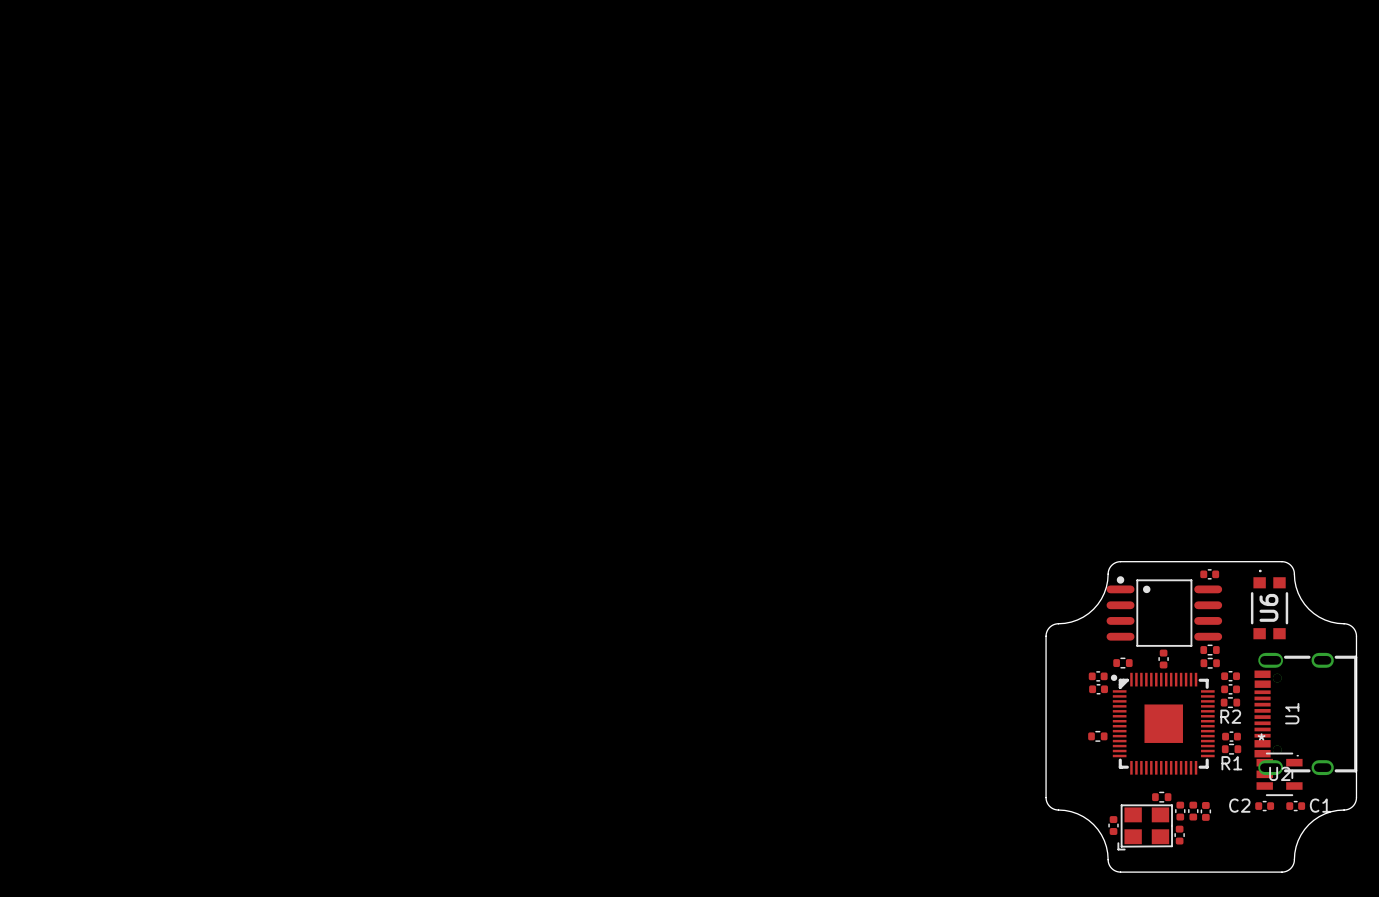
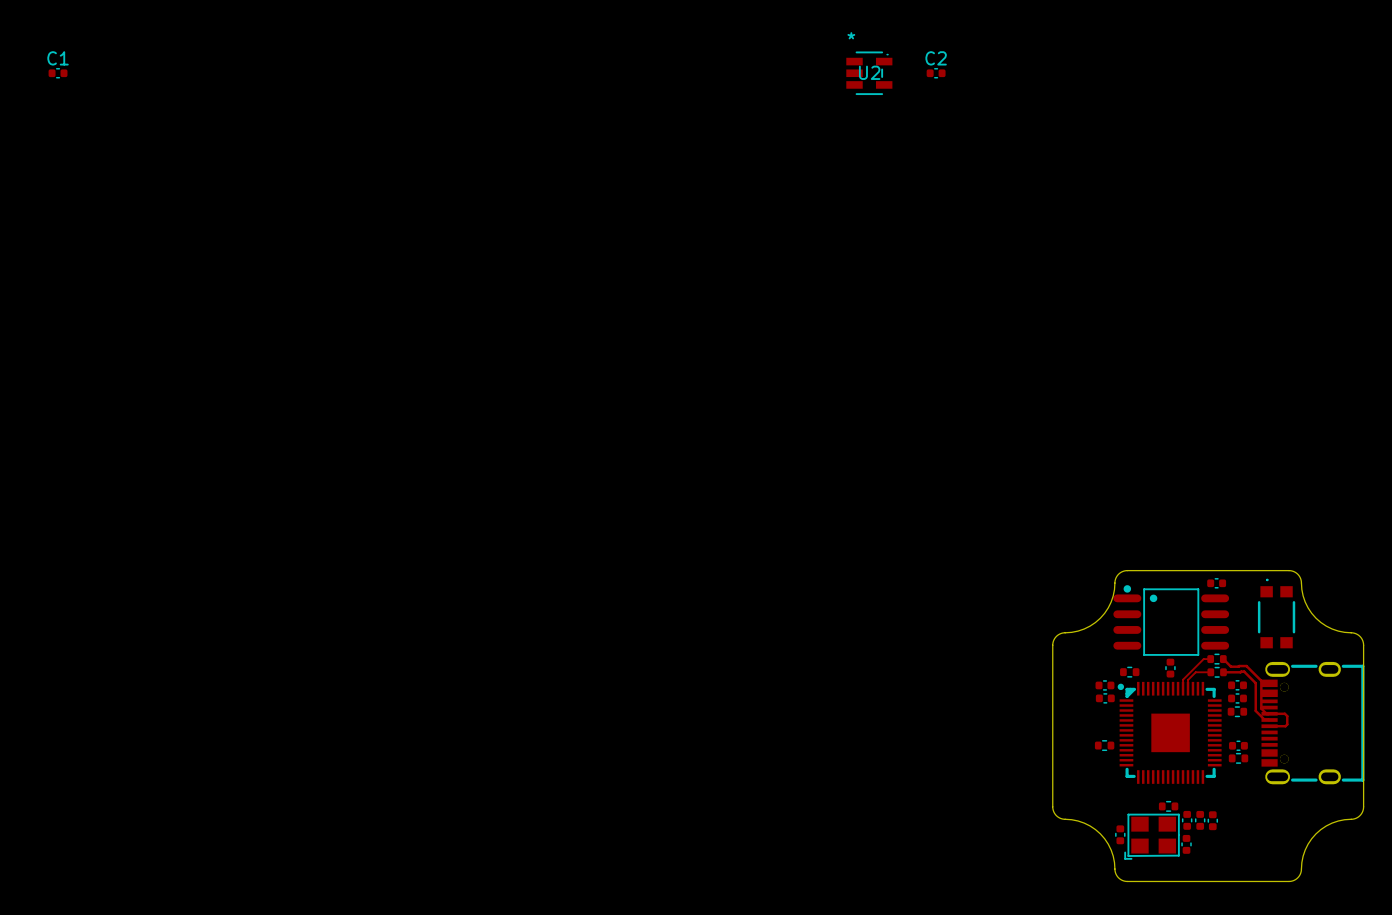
U6 name: U6 (1268, 607) -> none
track: none -> (1210, 659) (1203, 659) (1183, 679) (1183, 688)
track: none -> (1223, 659) (1230, 666) (1246, 666) (1261, 680) (1261, 708) (1266, 714) (1284, 713) (1287, 716) (1285, 726) (1274, 726)
track: none -> (1210, 672) (1195, 672) (1188, 680) (1188, 688)
track: none -> (1223, 672) (1244, 671) (1255, 683) (1255, 710) (1264, 719) (1274, 720)
U1 name: U1 (1292, 713) -> none
R2 name: R2 (1230, 716) -> none
R1 name: R1 (1231, 763) -> none
U2 position: (1279, 774) -> (869, 73)
C2 name position: C2 (1239, 805) -> C2 (936, 58)
C1 name position: C1 (1320, 805) -> C1 (58, 58)
C2 position: (1264, 806) -> (936, 73)
C1 position: (1295, 806) -> (58, 73)

